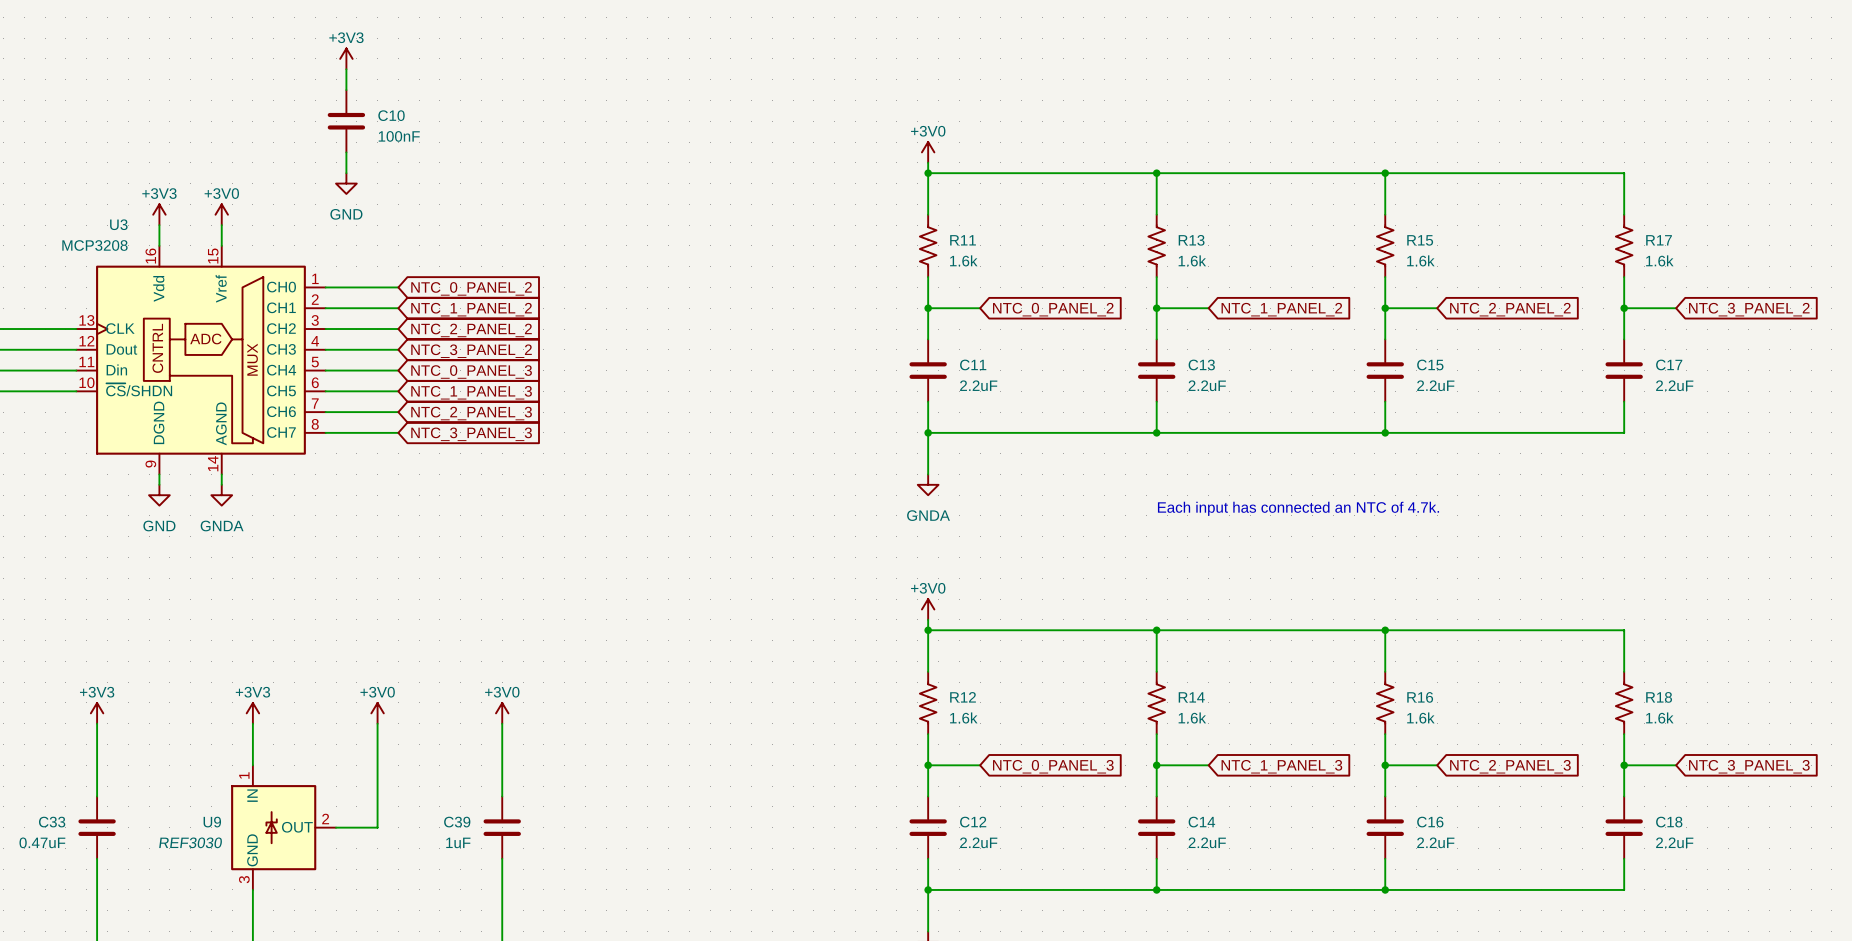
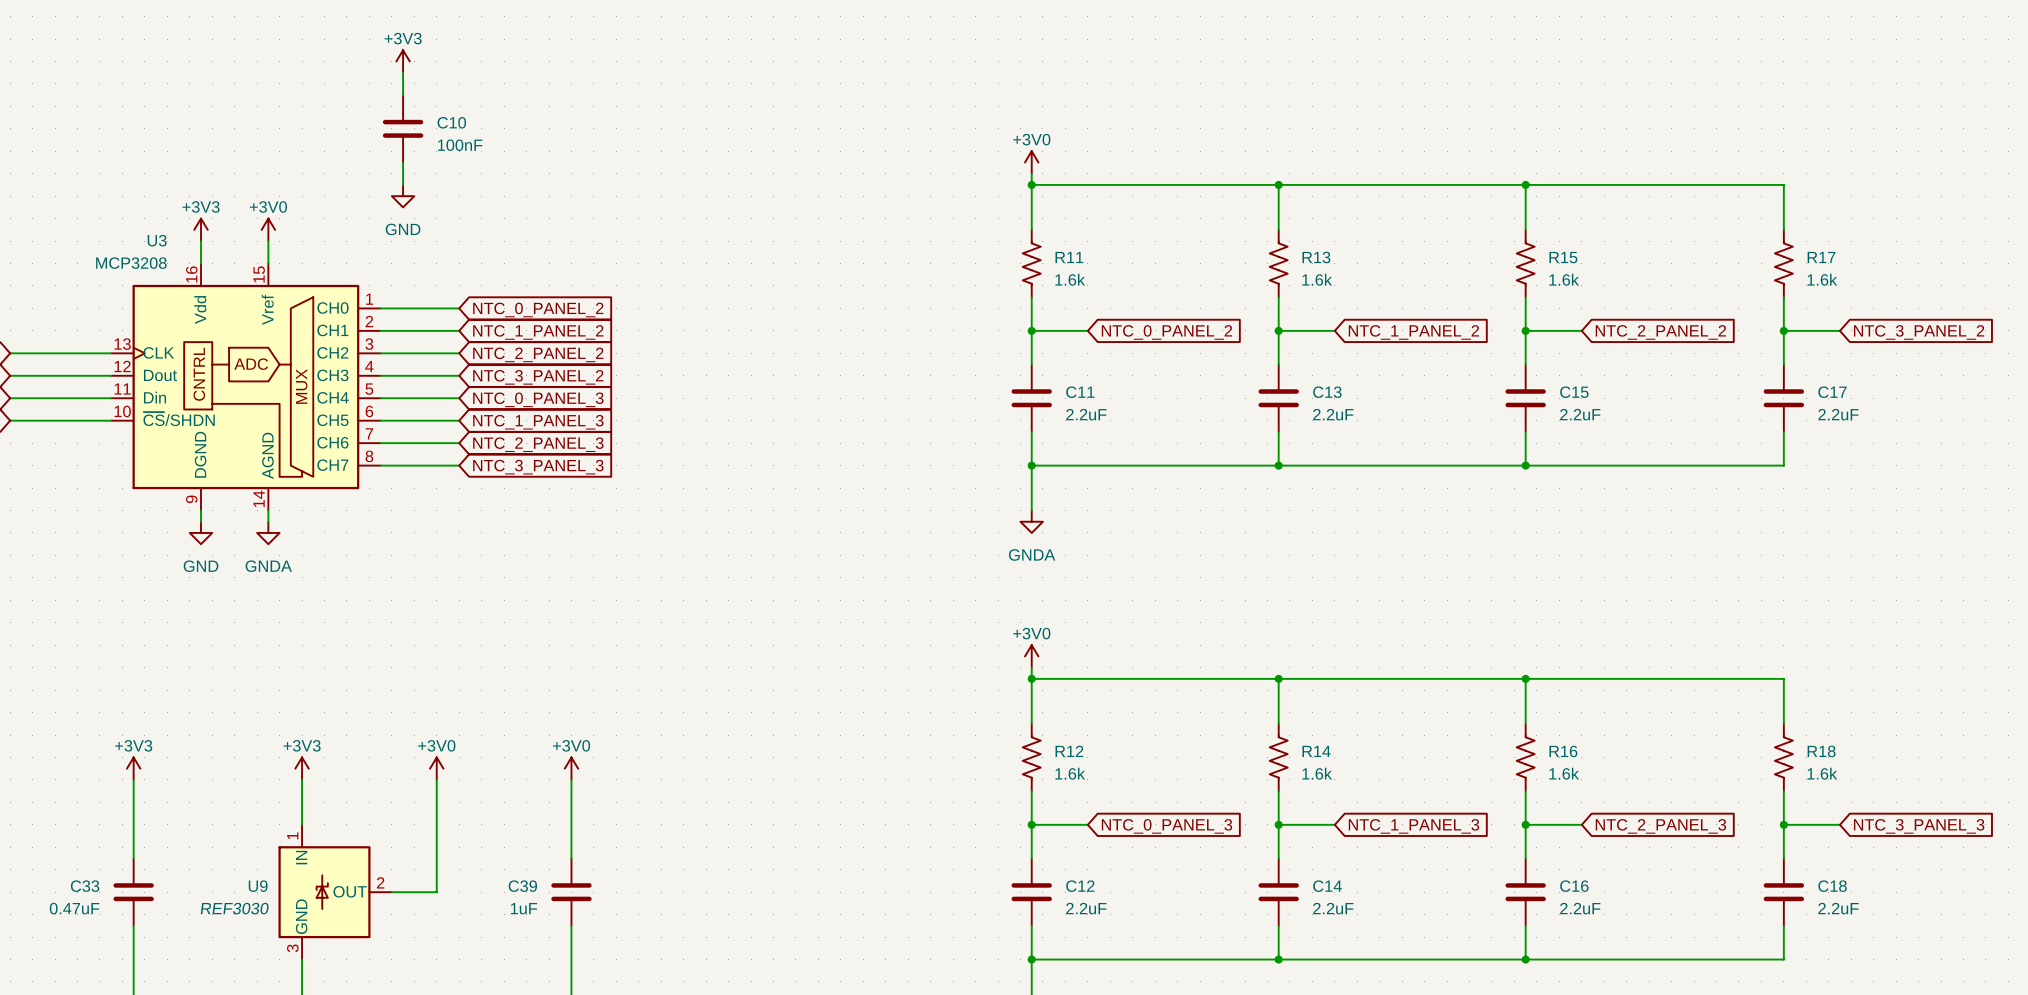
text: Each input has connected an NTC of 4.7k. (1298, 508) -> none

